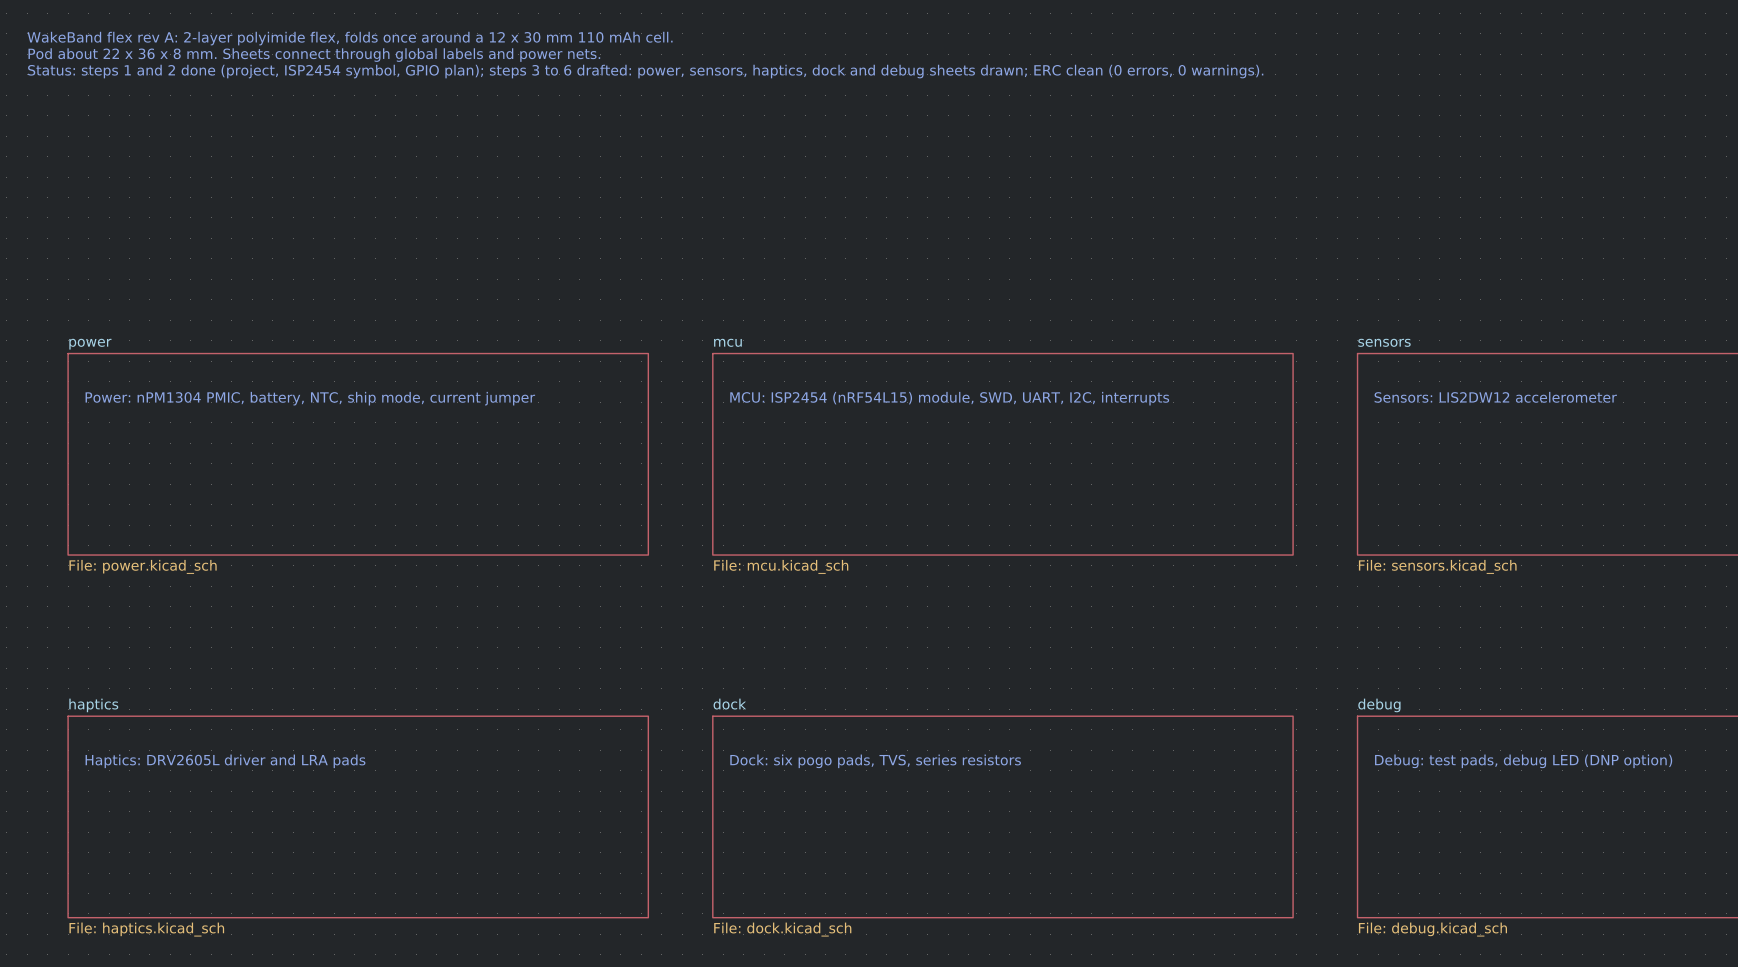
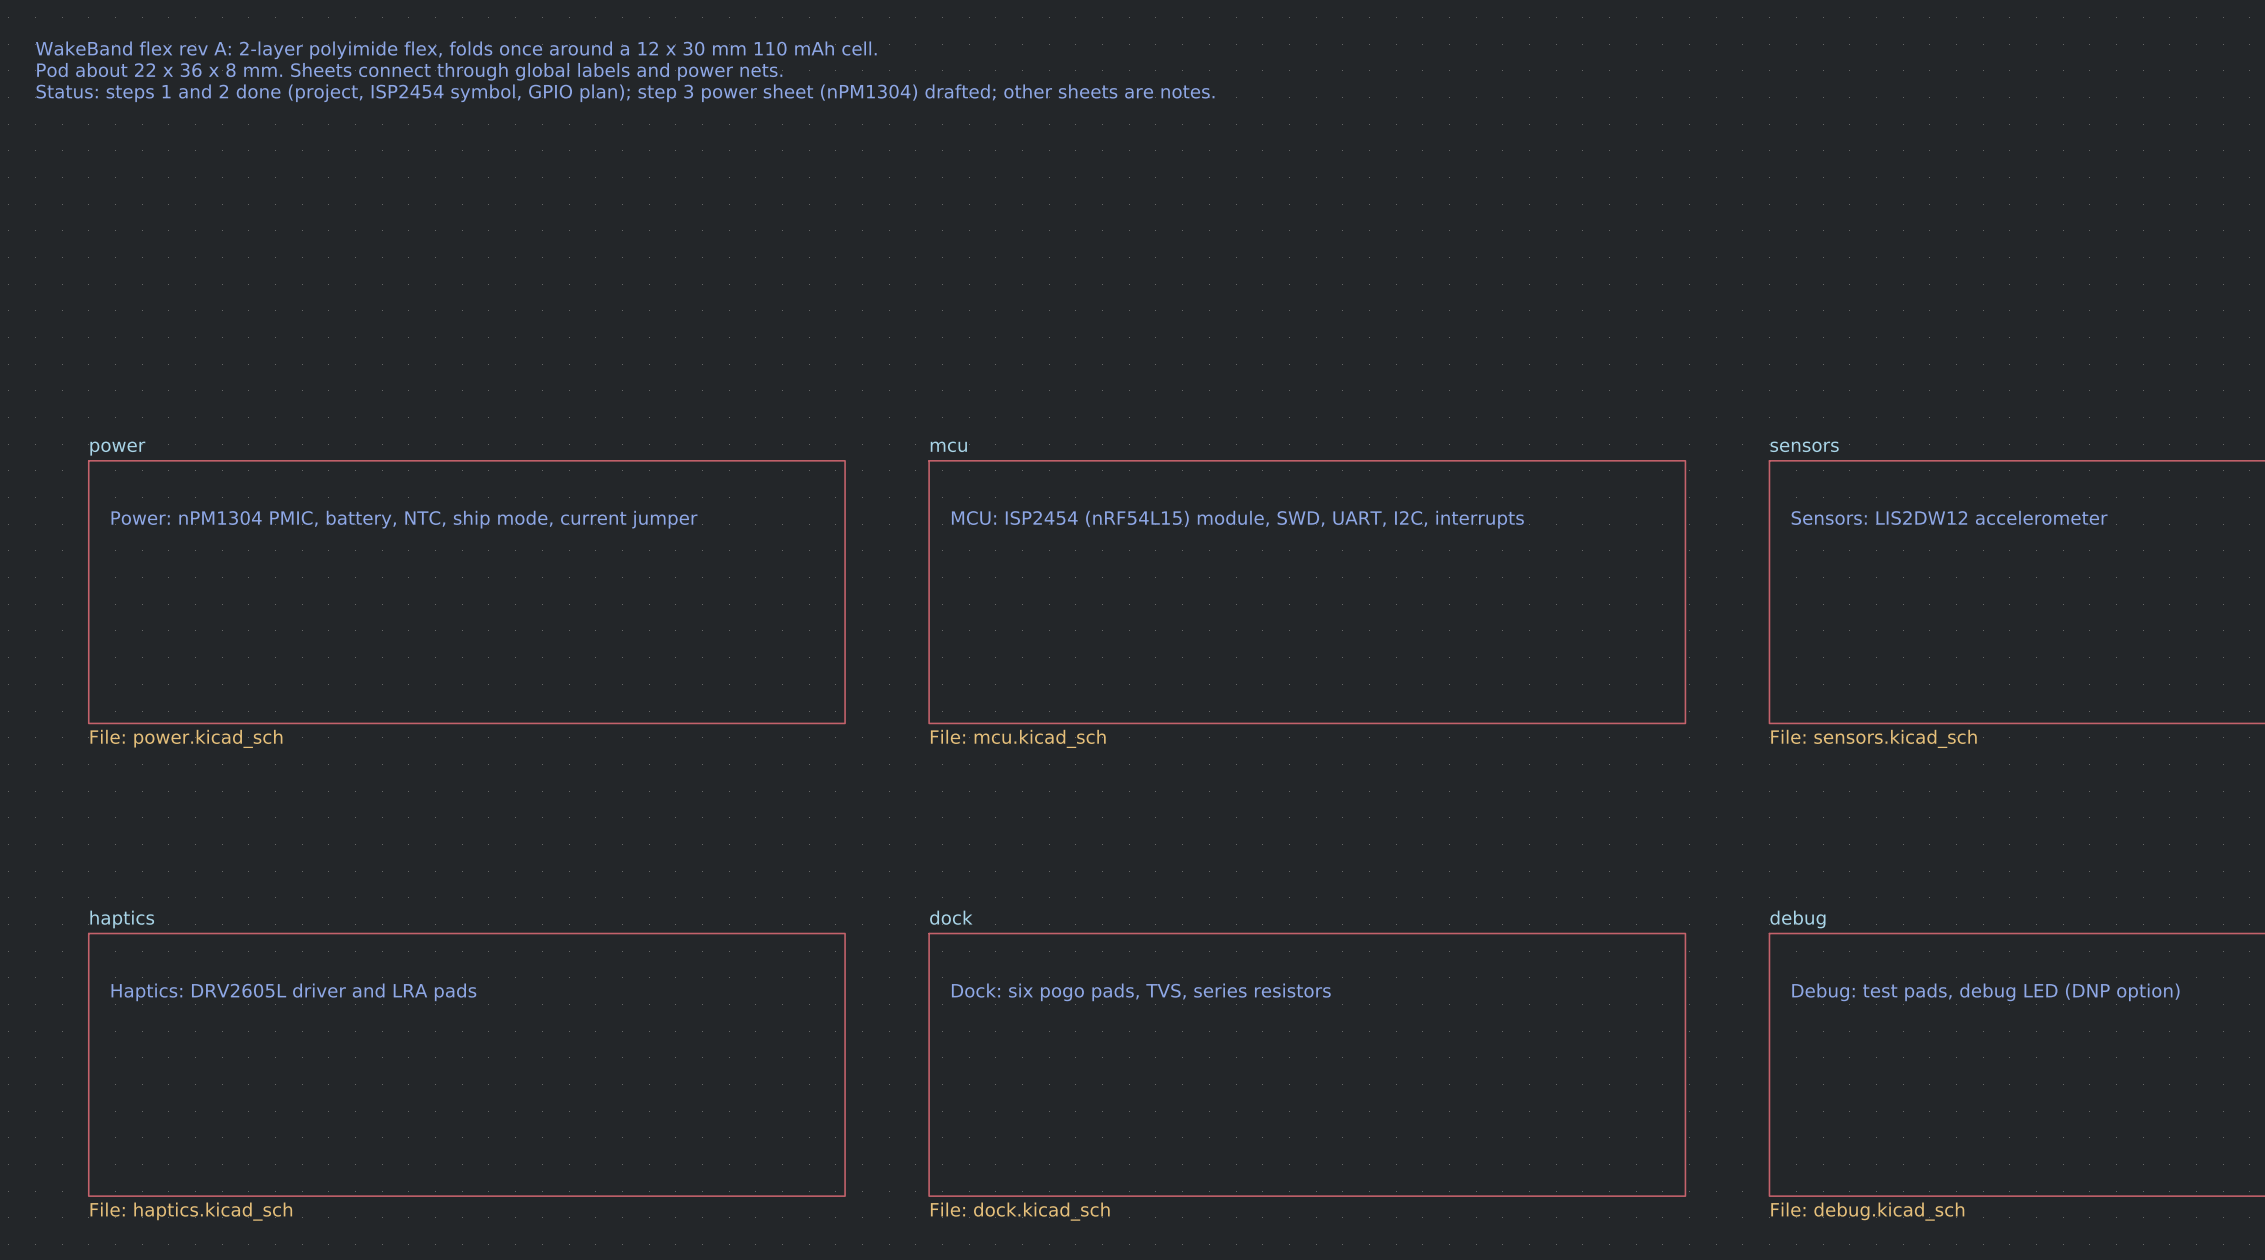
text: Status: steps 1 and 2 done (project, ISP2454 symbol, GPIO plan); steps 3 to 6 drafted: power, sensors, haptics, dock and debug sheets drawn; ERC clean (0 errors, 0 warnings). (645, 71) -> Status: steps 1 and 2 done (project, ISP2454 symbol, GPIO plan); step 3 power sheet (nPM1304) drafted; other sheets are notes. (625, 93)

